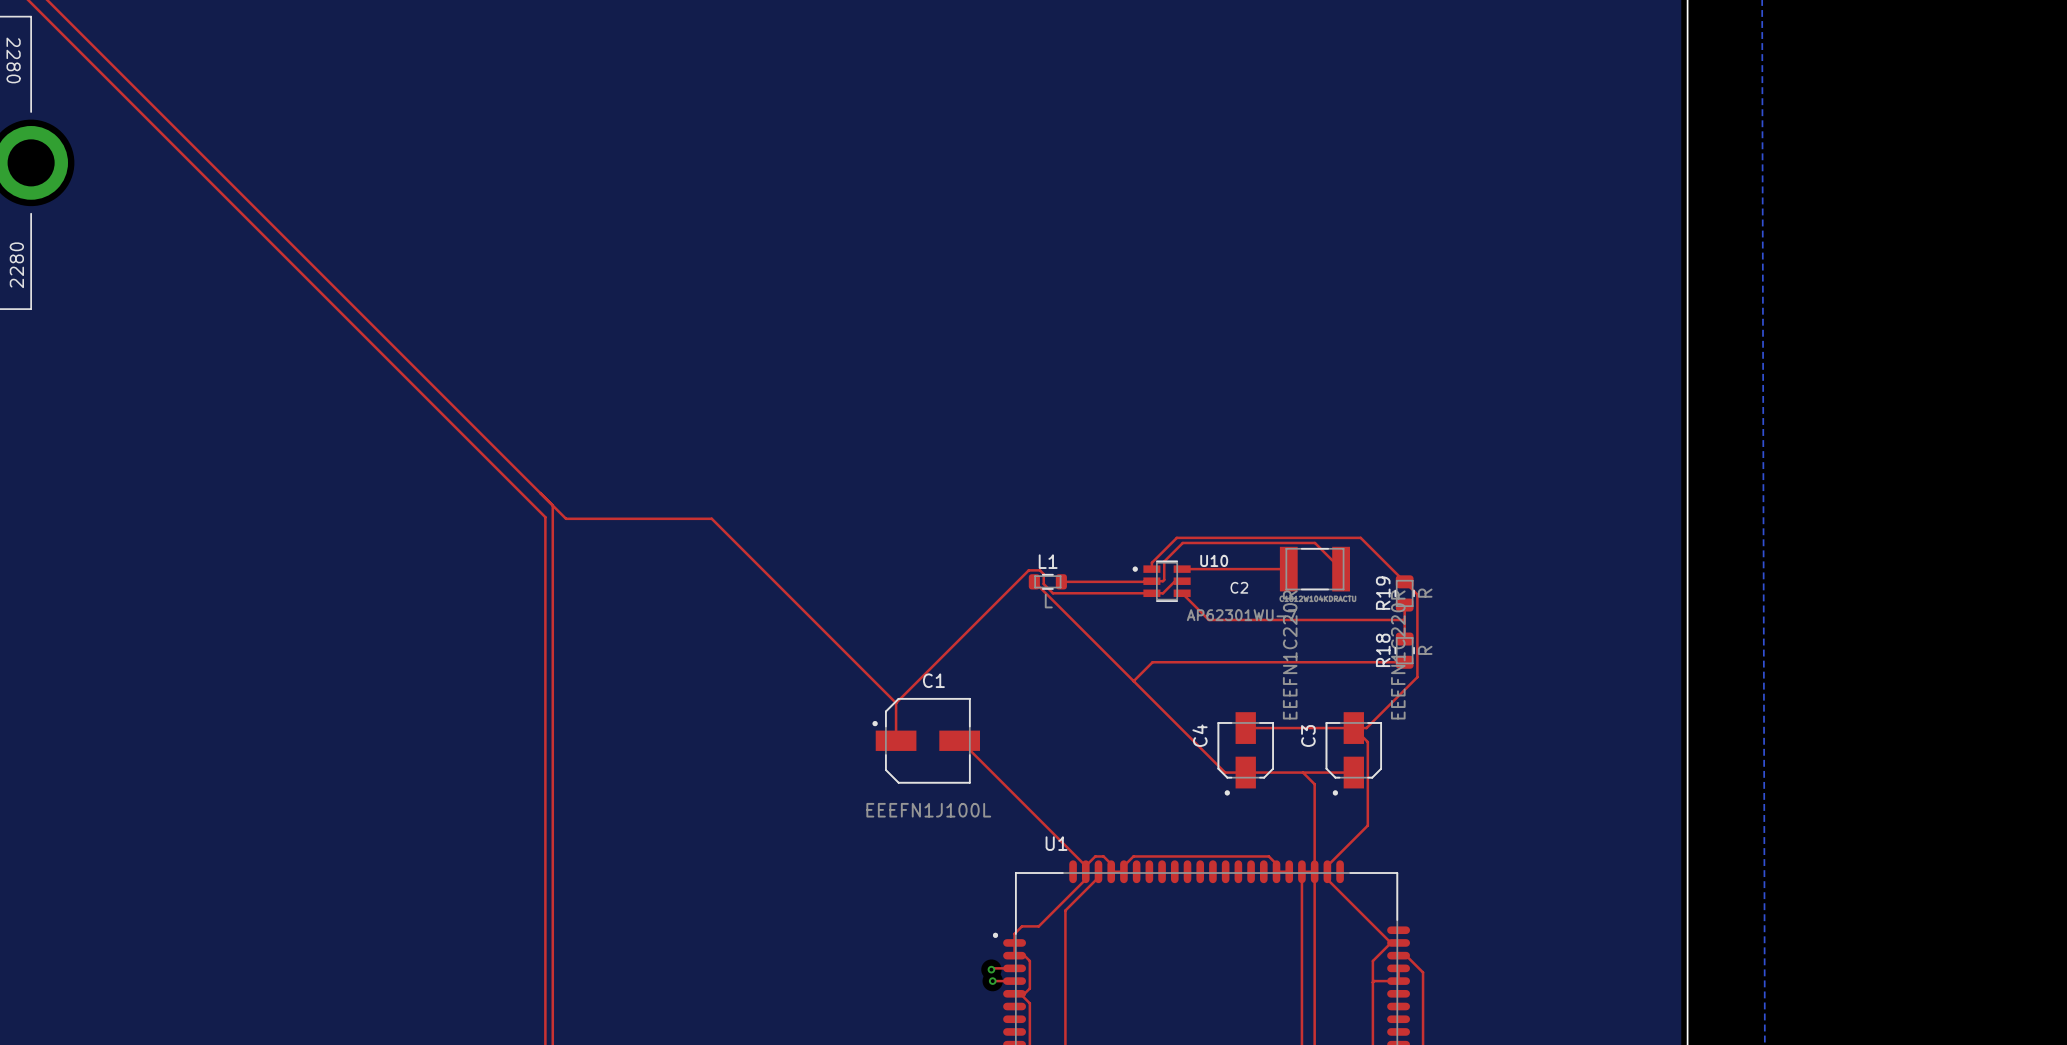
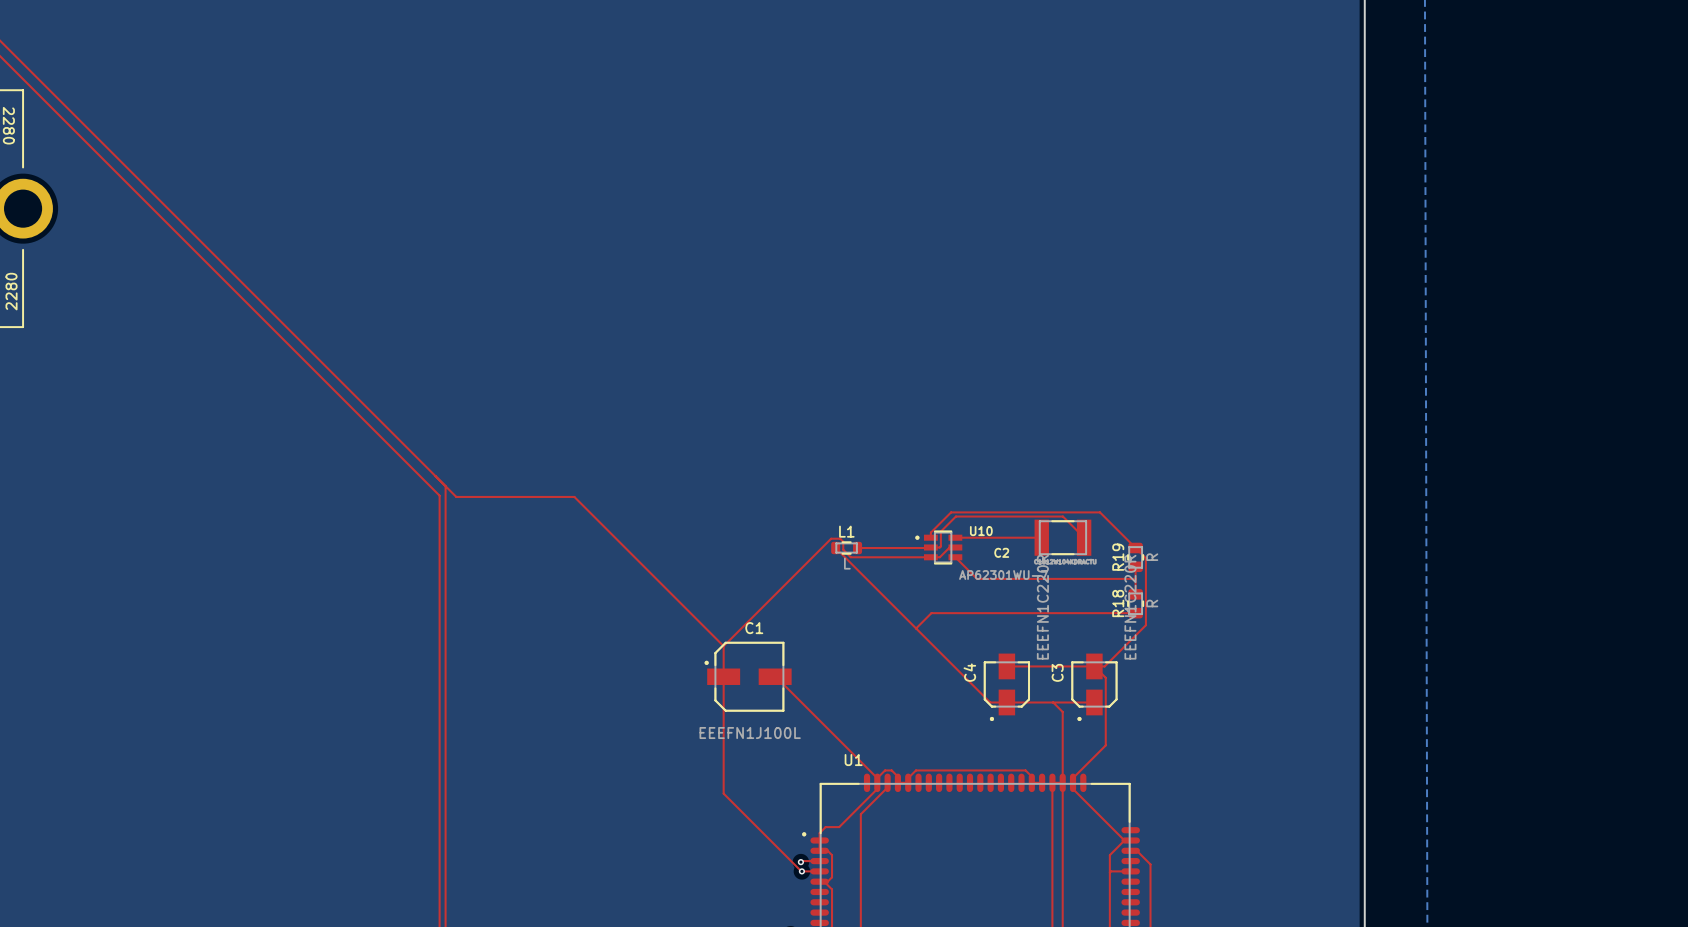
top track: none -> (723, 676) (723, 793) (801, 871)

